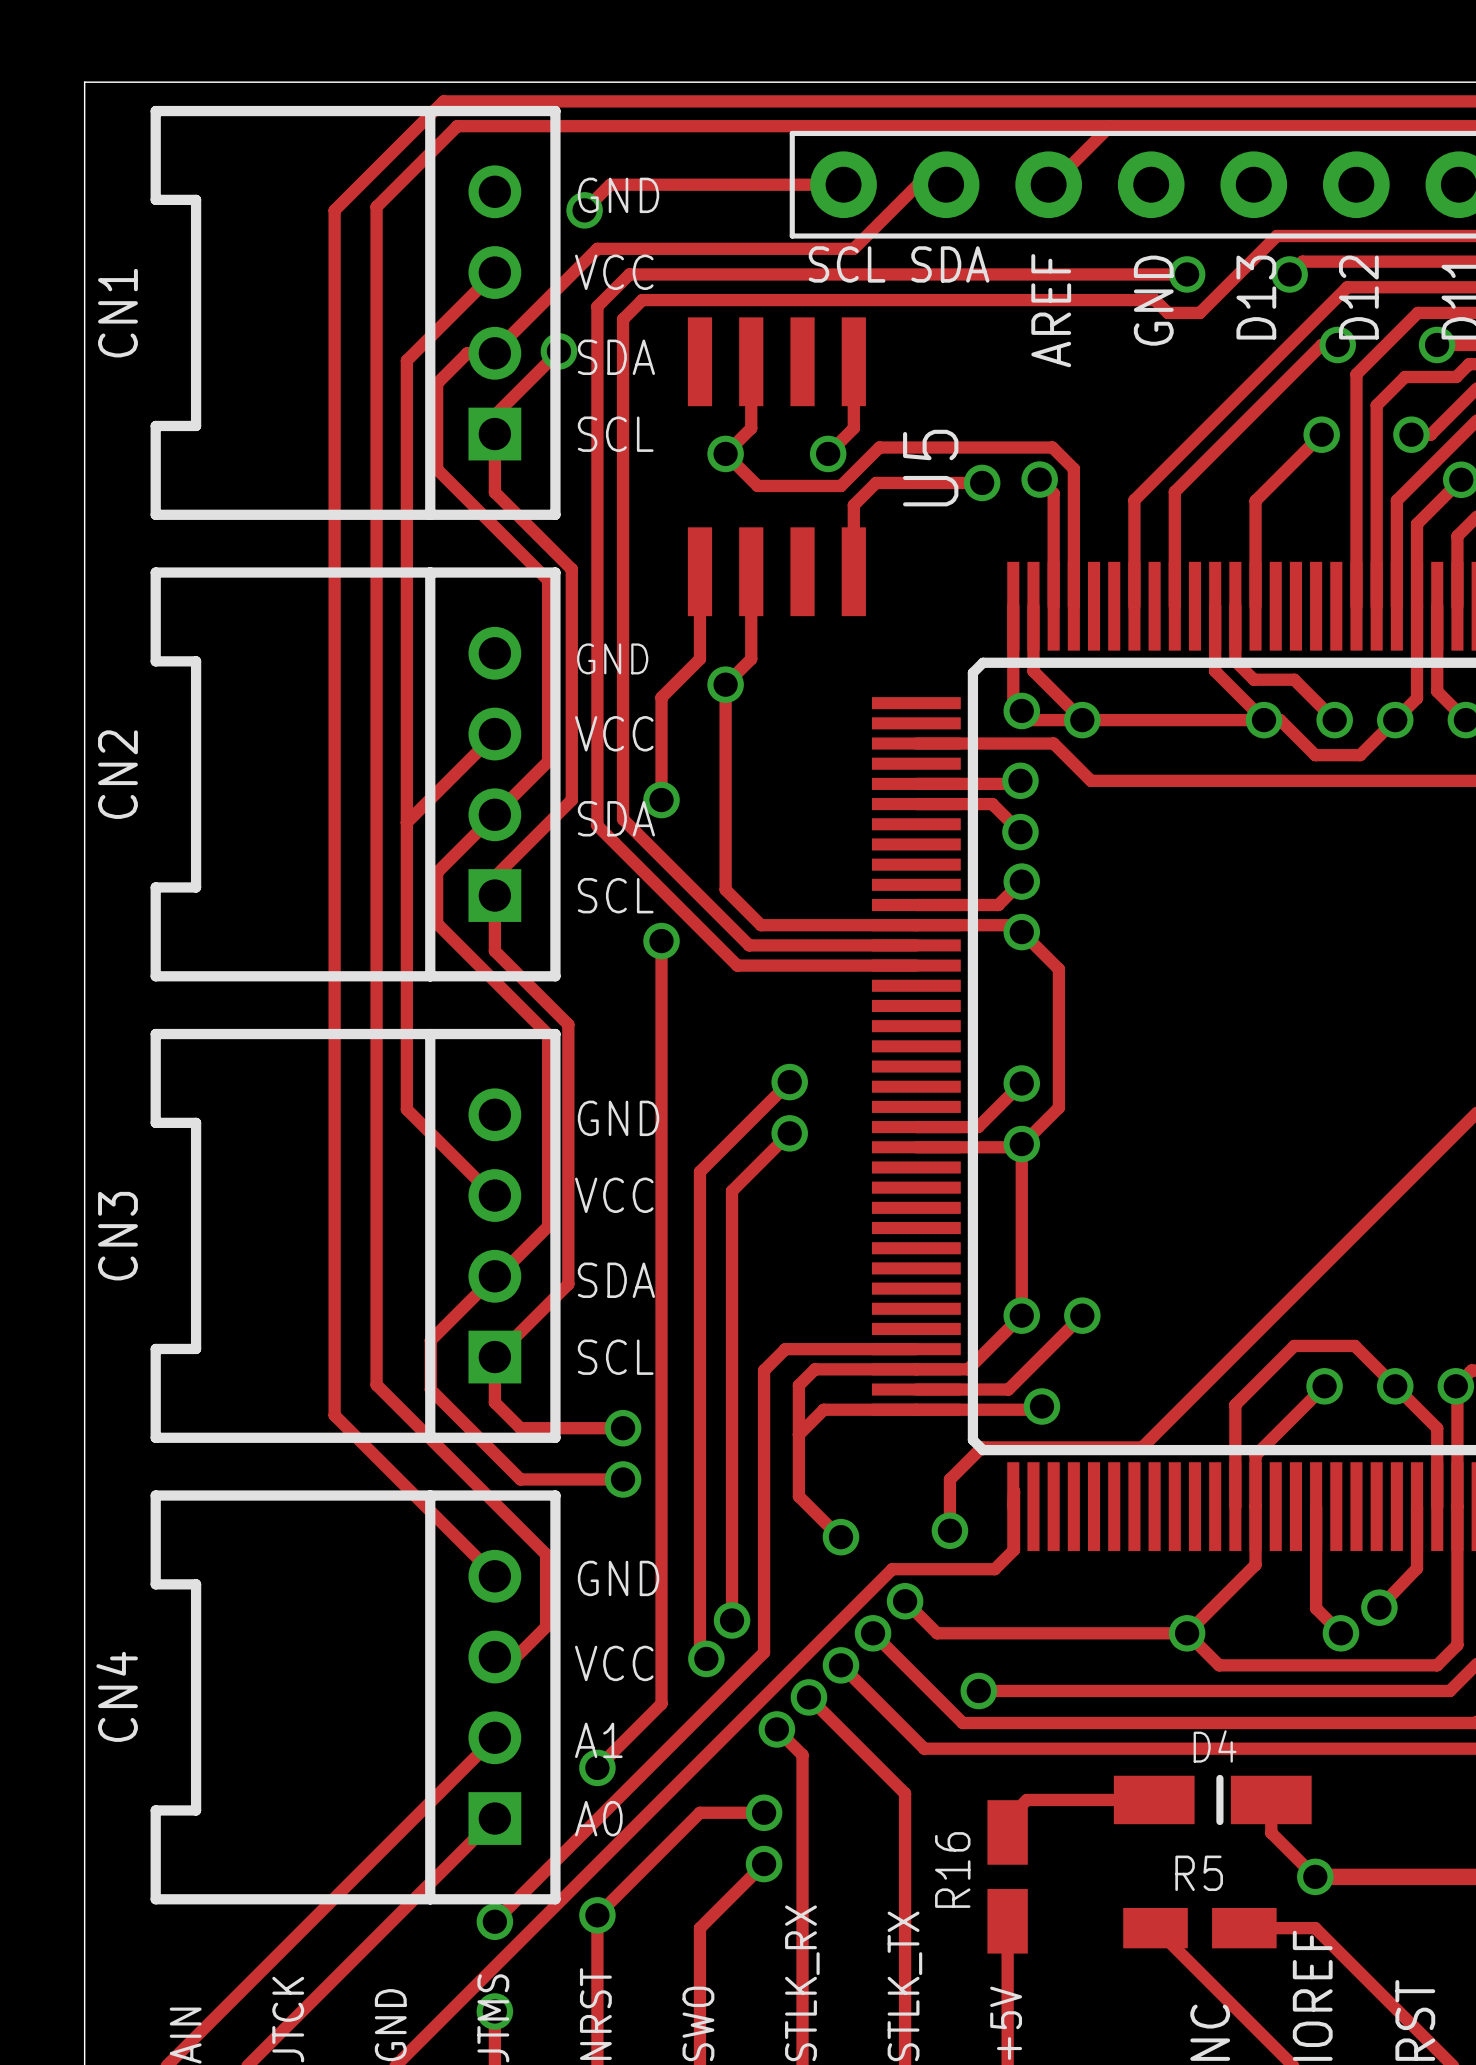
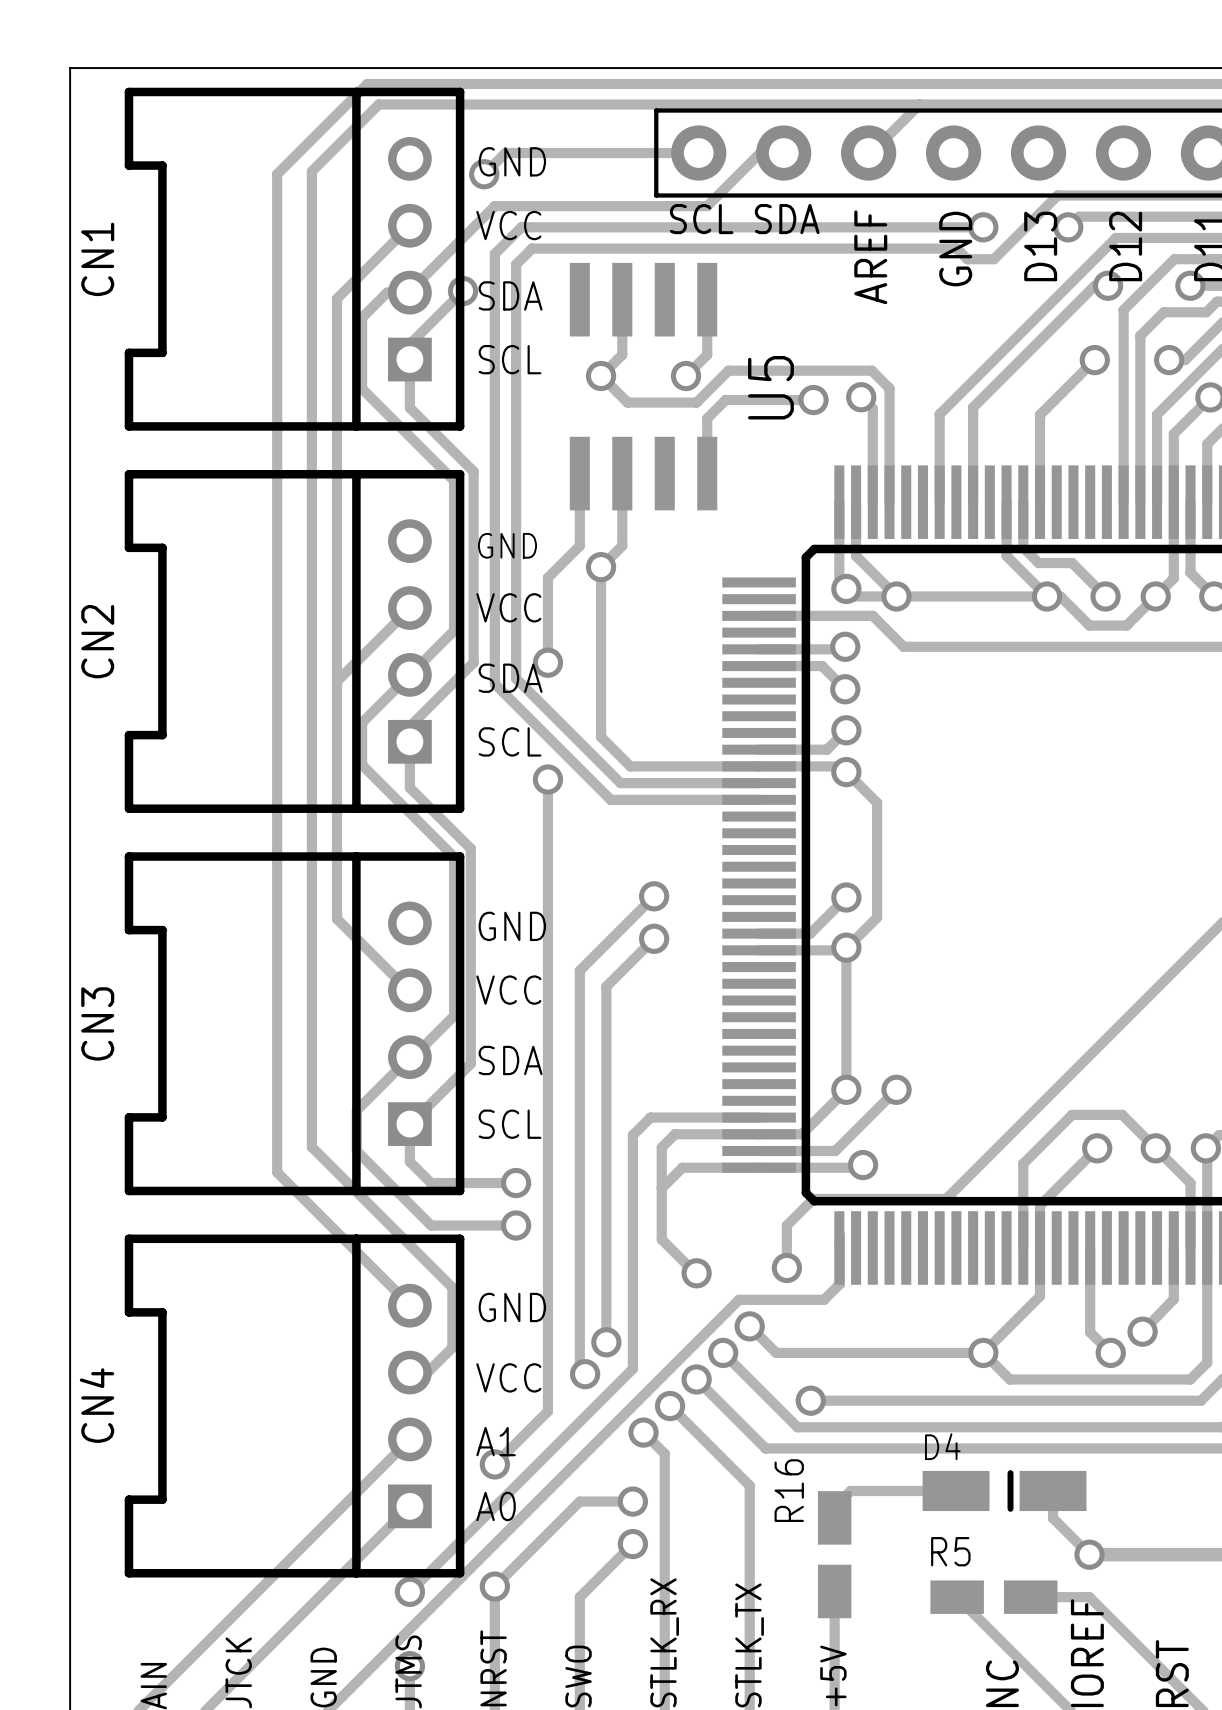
D4 name position: D4 (1215, 1746) -> D4 (942, 1446)
R16 name position: R16 (952, 1870) -> R16 (789, 1490)
R5 name position: R5 (1199, 1873) -> R5 (950, 1551)

